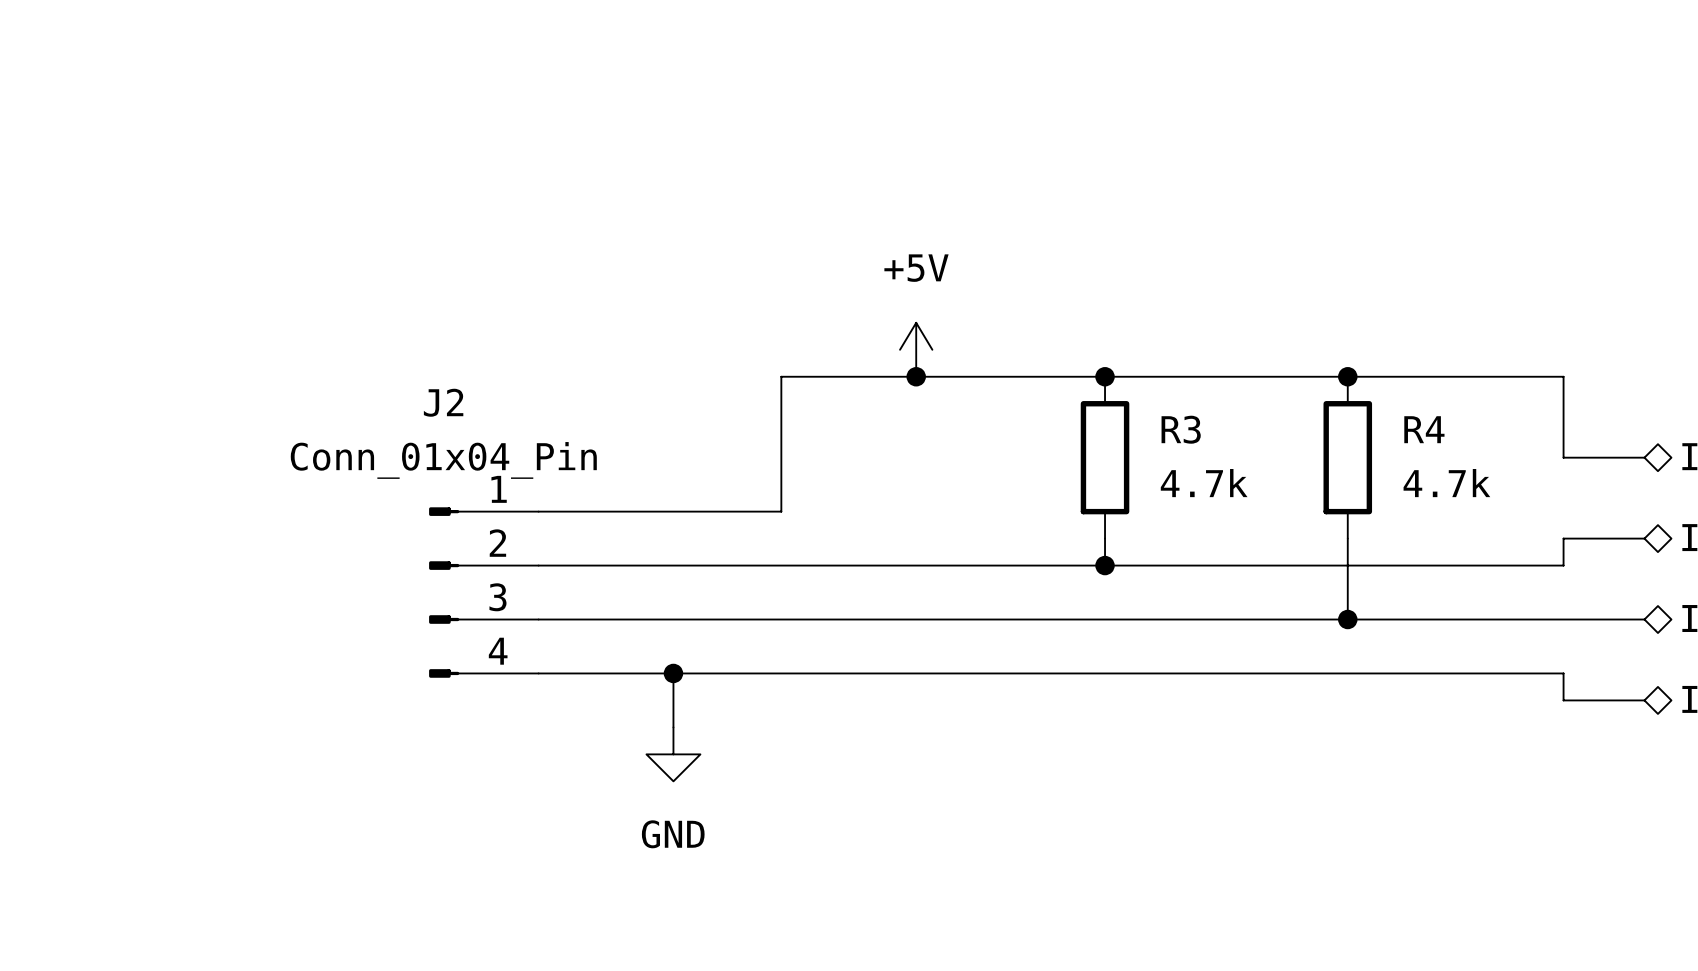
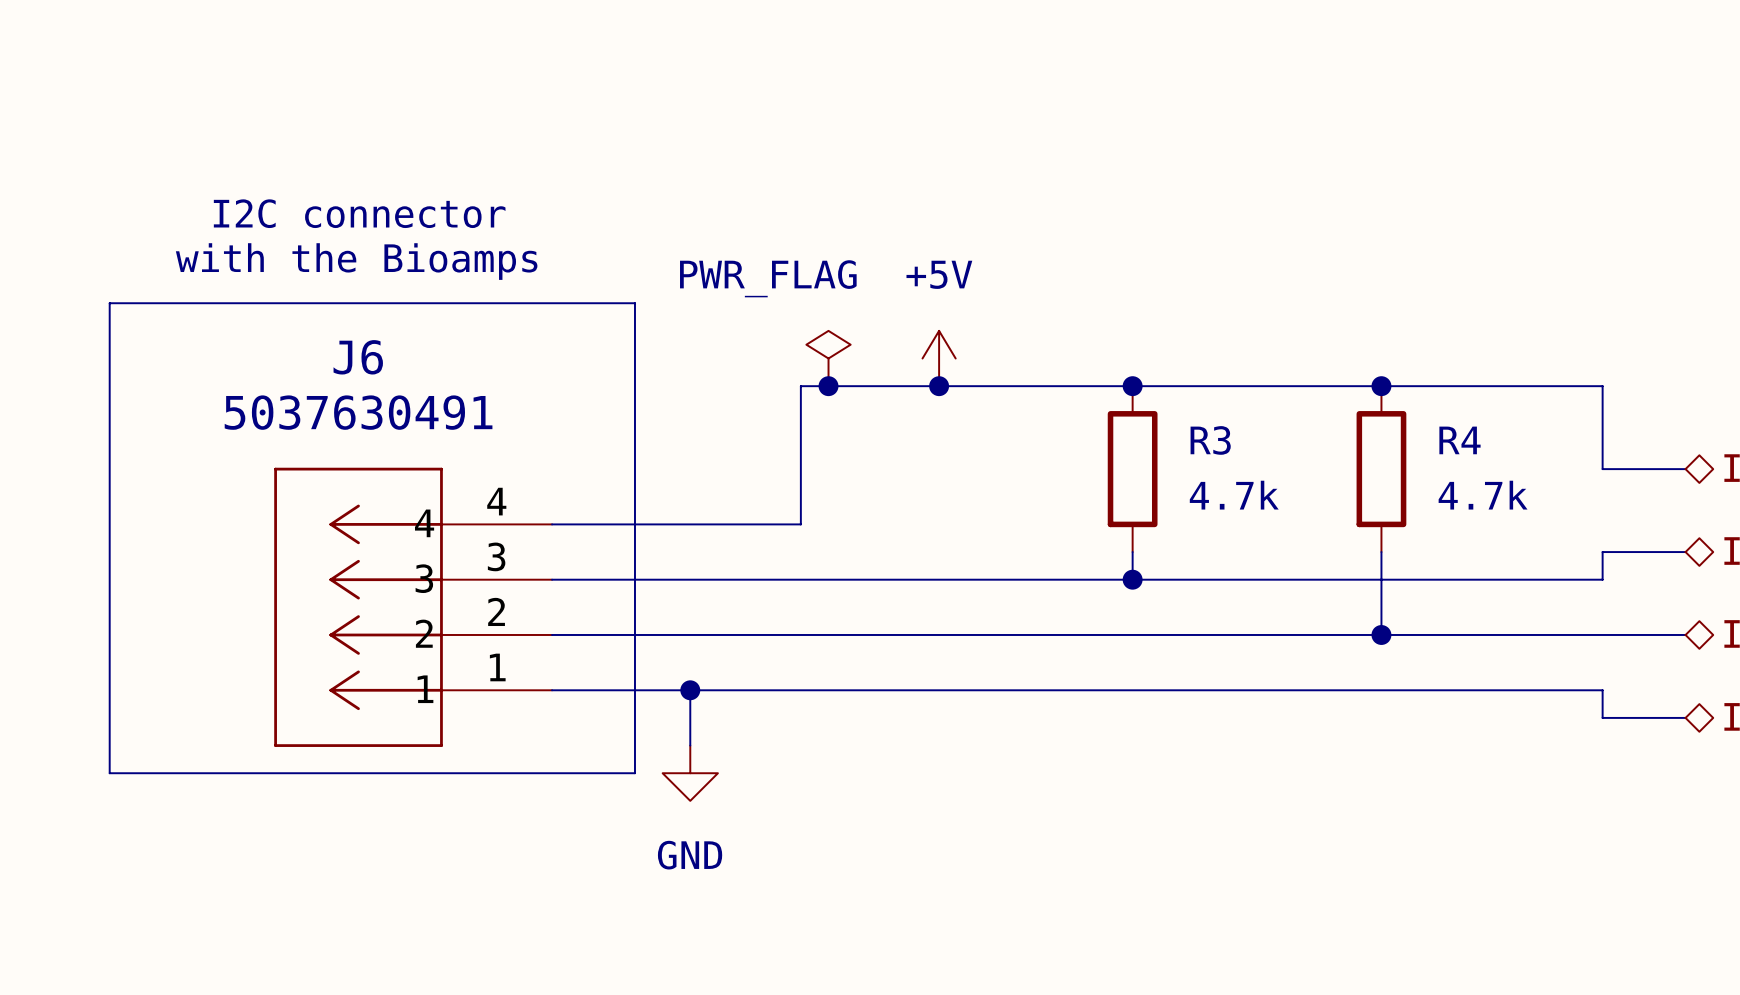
text: none -> I2C connector (359, 213)
text: none -> with the Bioamps (356, 261)
line: none -> (109, 303) (634, 303) (634, 773) (109, 773) (109, 303)
power symbol: none -> PWR_FLAG (828, 358)
junction: none -> (828, 386)
J6: none -> 5037630491 (413, 607)
J2: Conn_01x04_Pin (483, 592) -> none

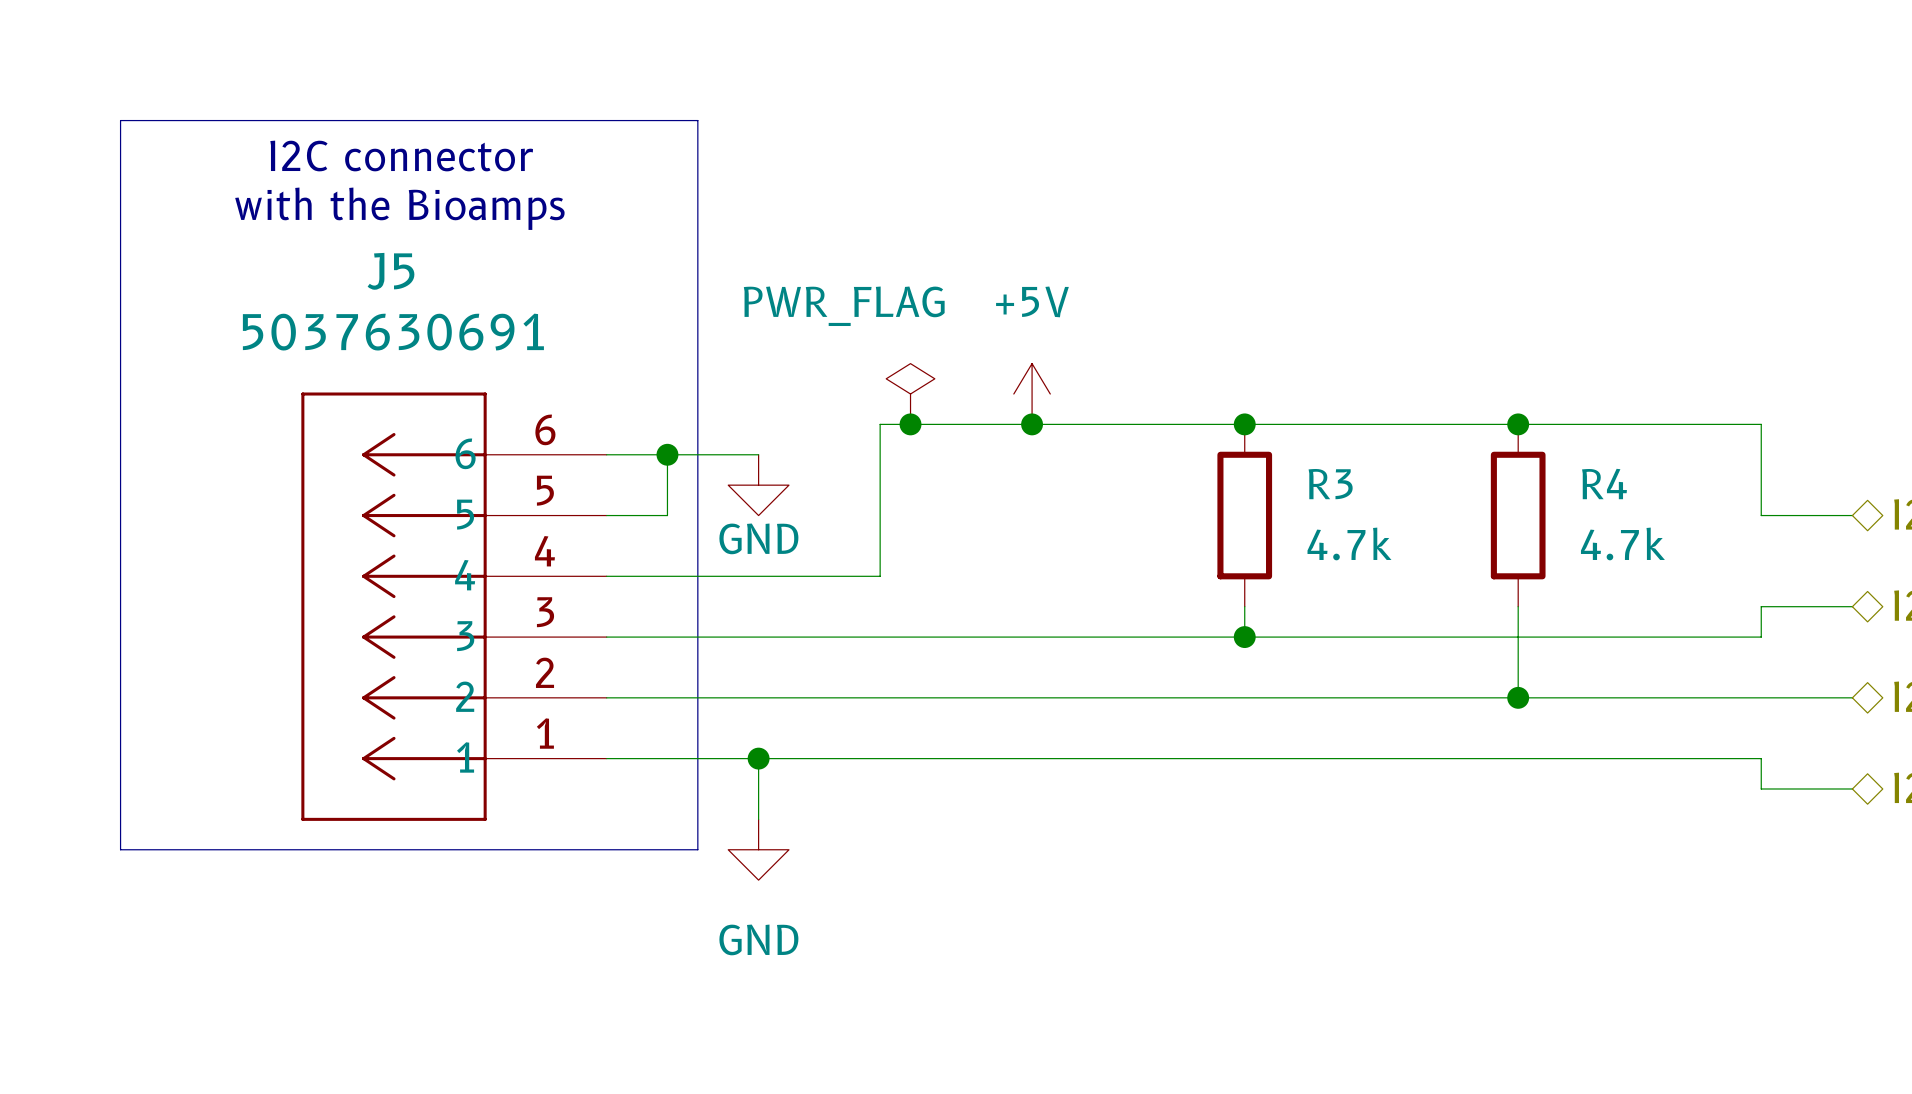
text position: I2C connector (359, 213) -> I2C connector (401, 155)
text position: with the Bioamps (356, 261) -> with the Bioamps (399, 208)
line: (109, 303) (634, 303) -> (120, 333) (120, 120) (697, 120) (697, 333)
wire: none -> (606, 454) (758, 454)
wire: none -> (667, 454) (667, 515) (606, 515)
junction: none -> (667, 454)
power symbol: none -> GND (758, 485)
J5: none -> 5037630691 (454, 606)
J6: 5037630491 (413, 607) -> none

